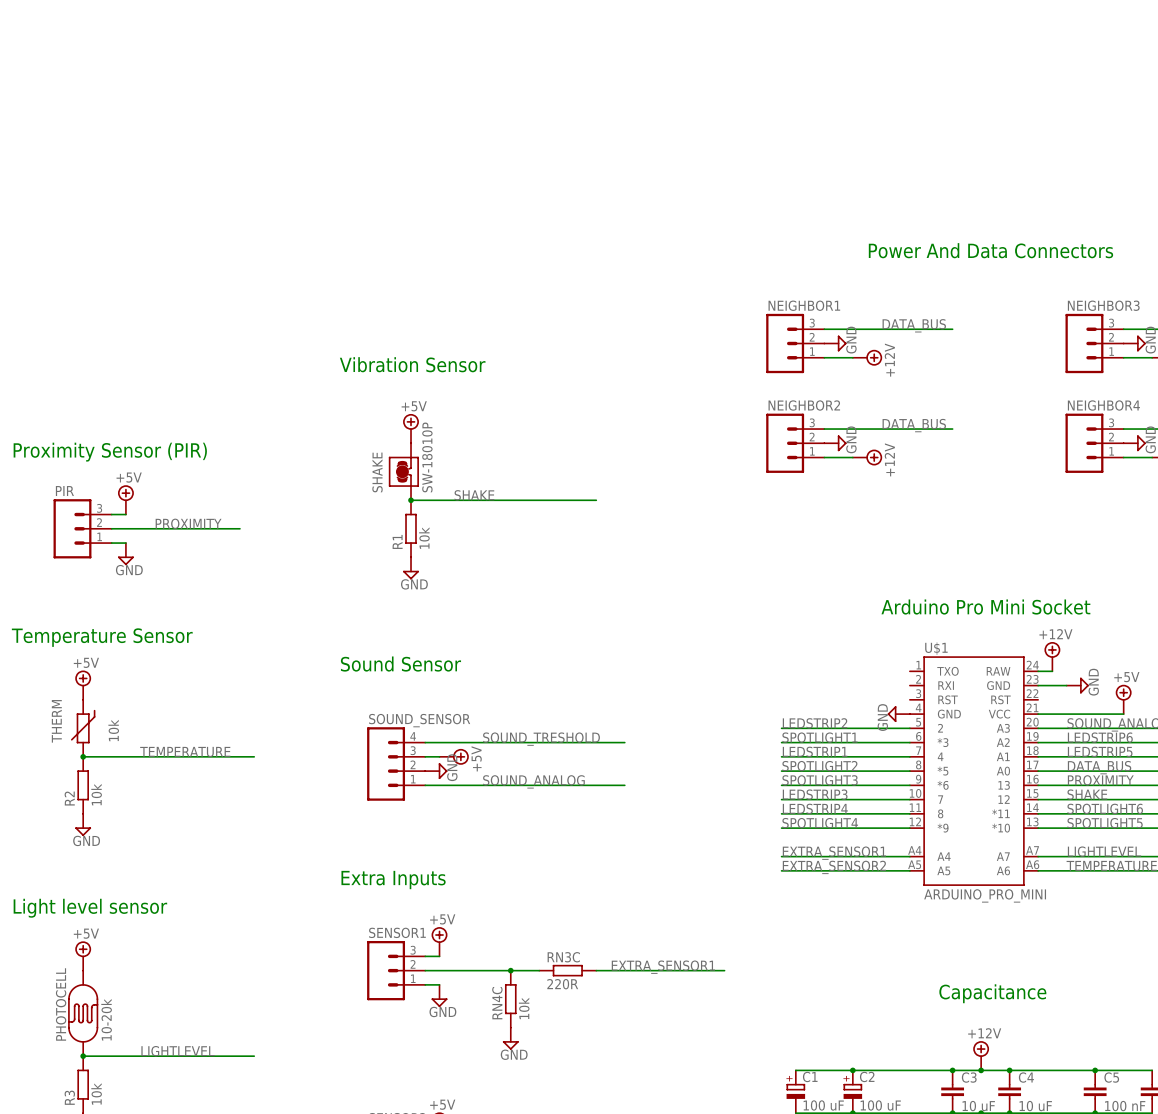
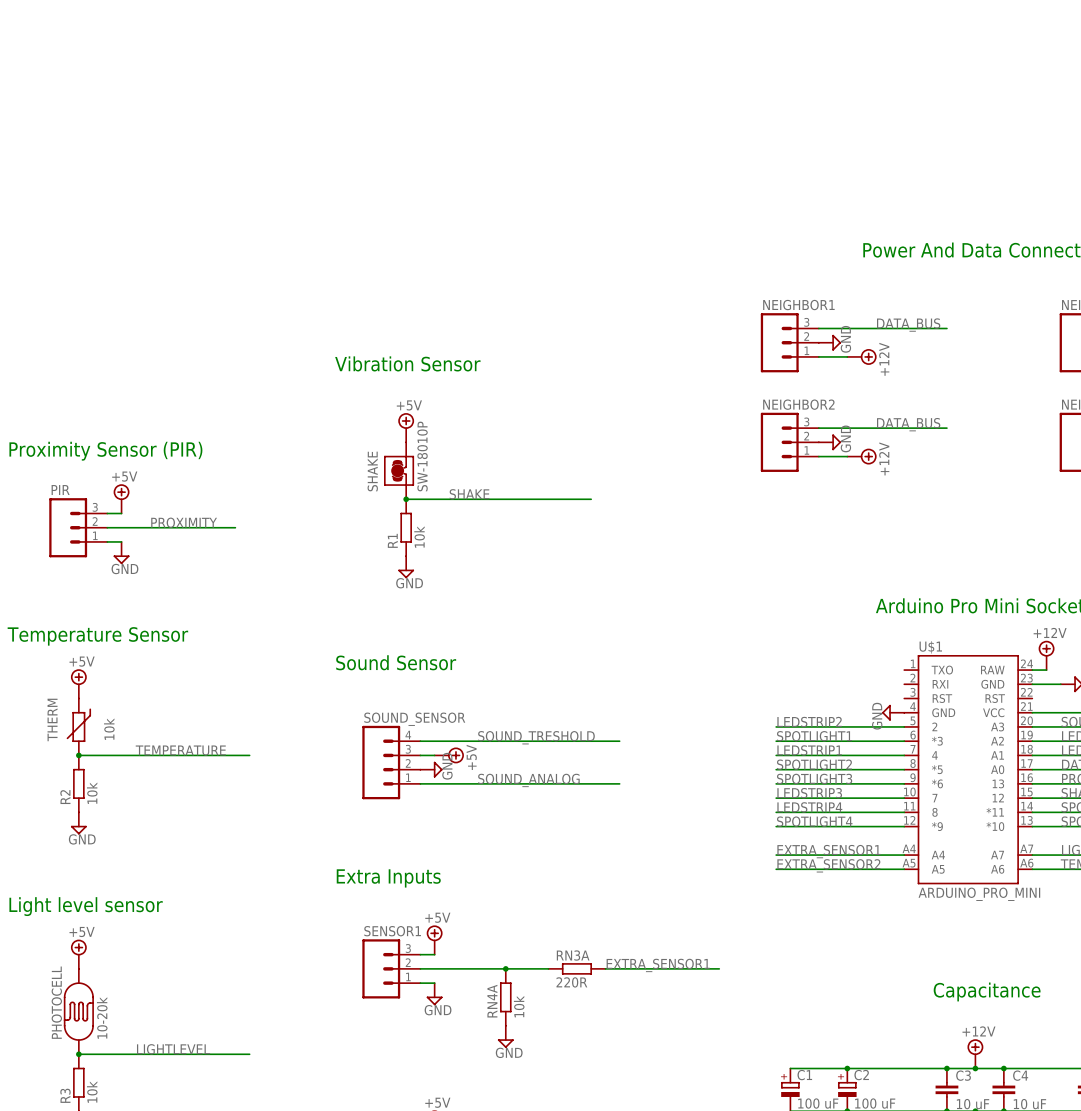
RN3C: 220R (567, 970) -> none
RN3A: none -> 220R (576, 968)
RN4C name: RN4C (497, 1003) -> RN4A (492, 1001)

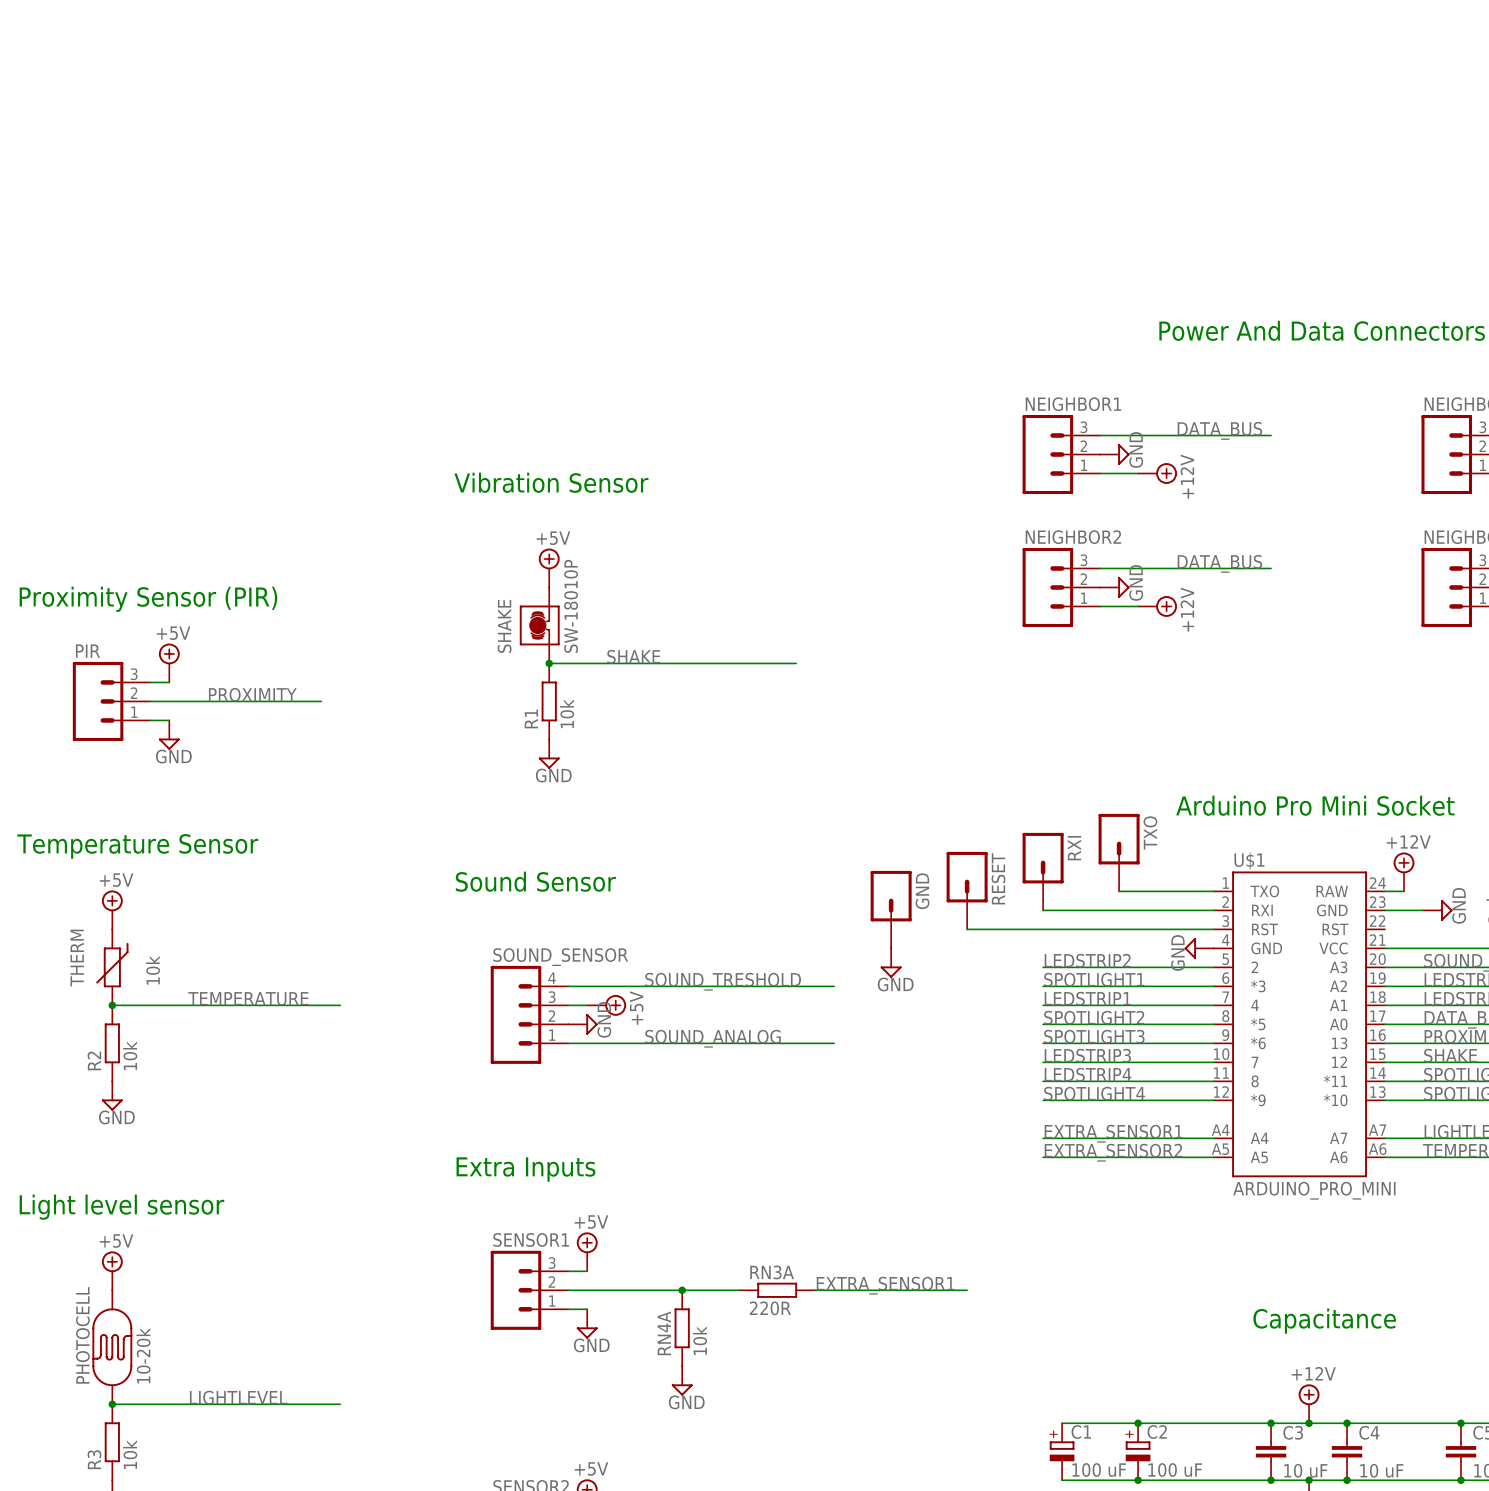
TXO: none -> (1119, 852)
RXI: none -> (1043, 871)
RESET: none -> (967, 890)
wire: none -> (1119, 891) (1214, 891)
GND: none -> (891, 909)
wire: none -> (1043, 910) (1214, 910)
wire: none -> (967, 929) (1214, 929)
power symbol: none -> GND (891, 963)

